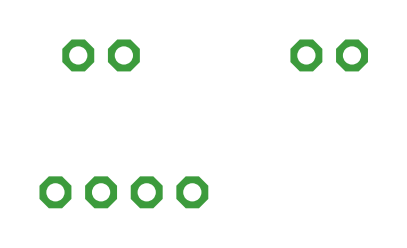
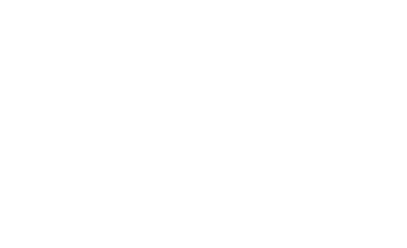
part: (101, 55) -> none
part: (329, 55) -> none
part: (123, 192) -> none

